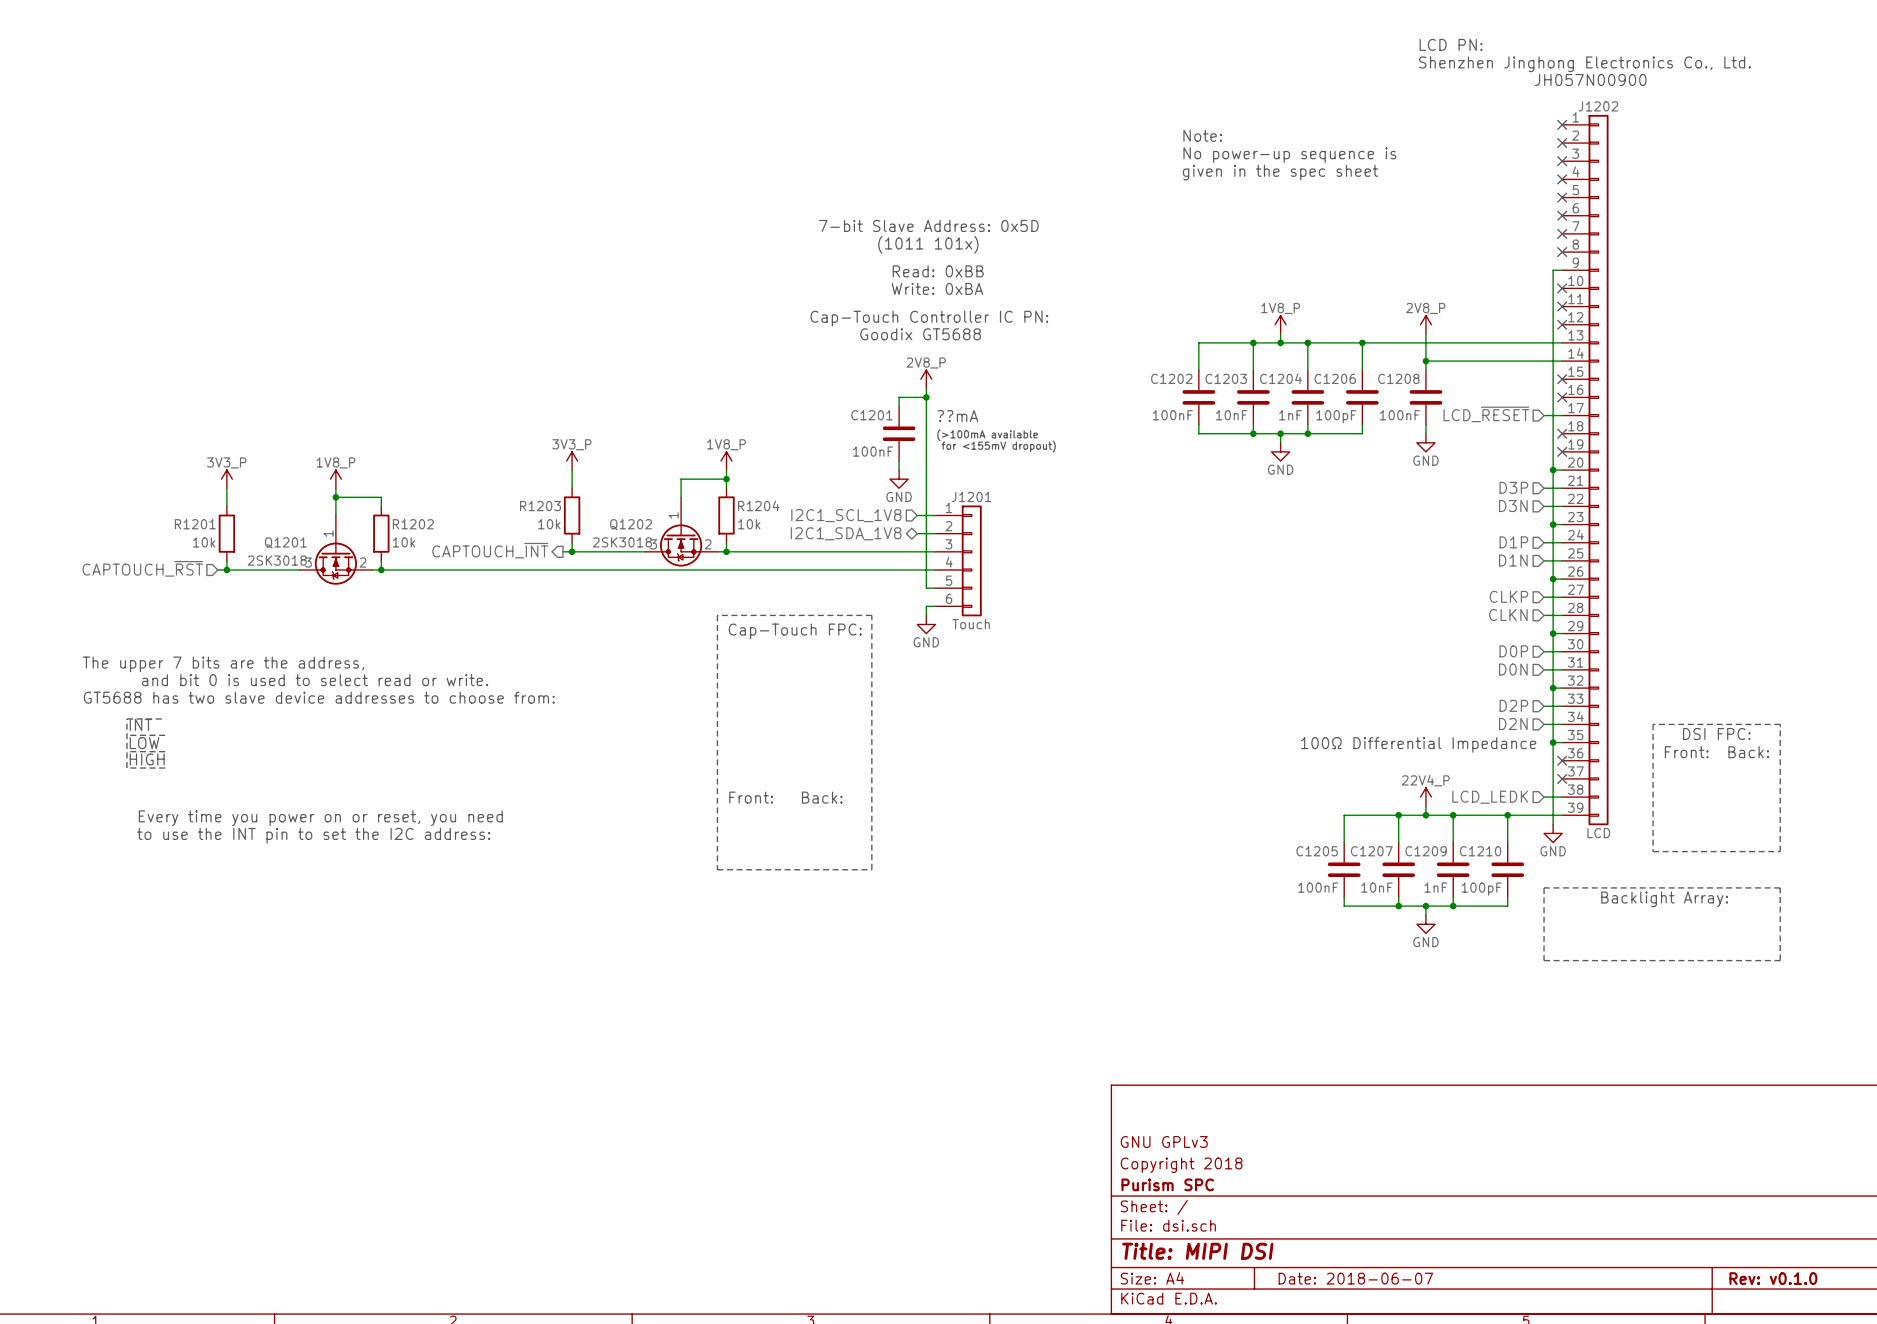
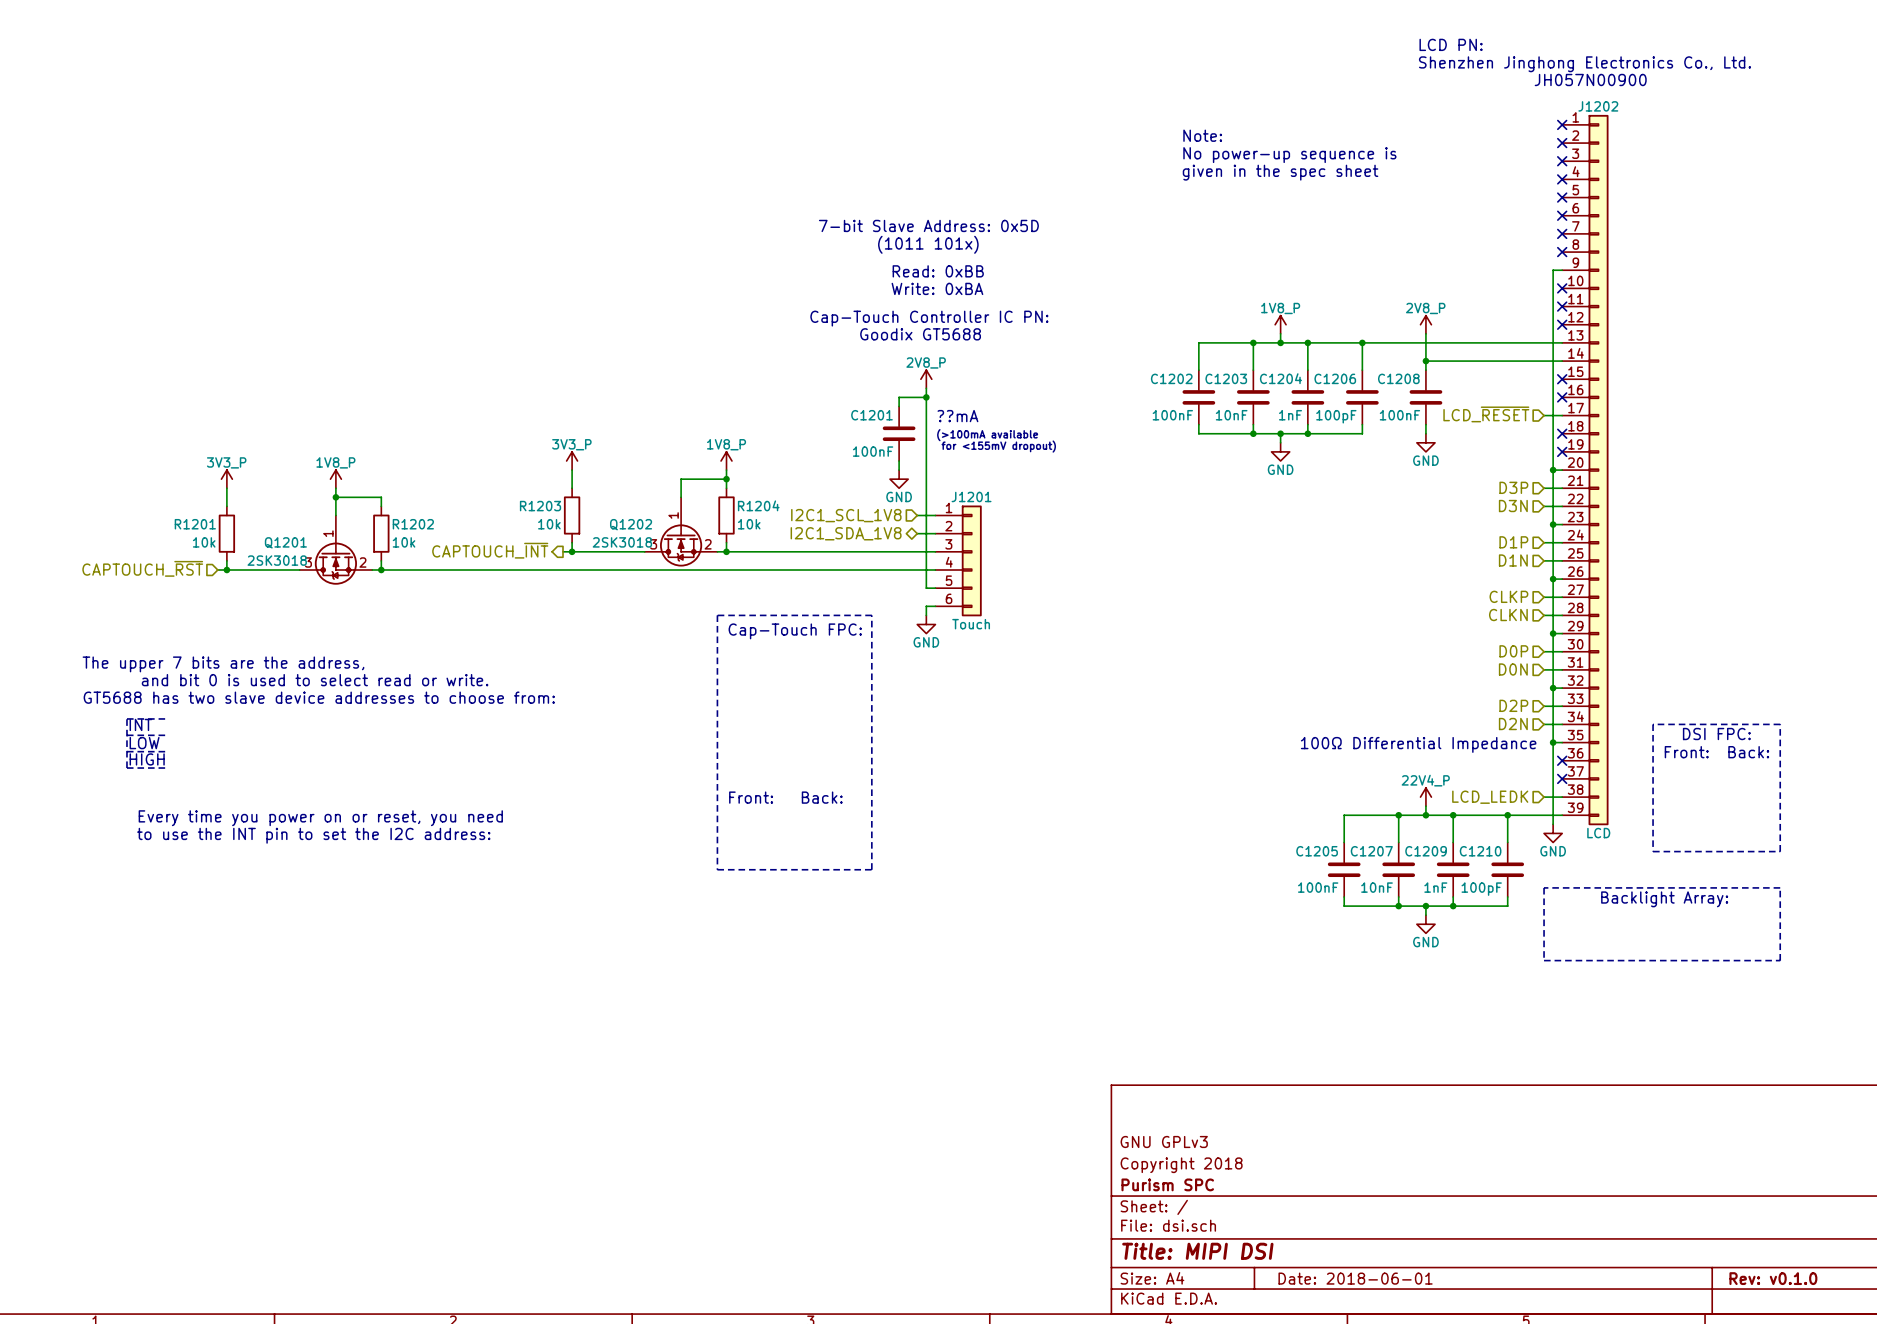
title block: Date: 2018-06-07 (1355, 1278) -> Date: 2018-06-01 (1355, 1278)

